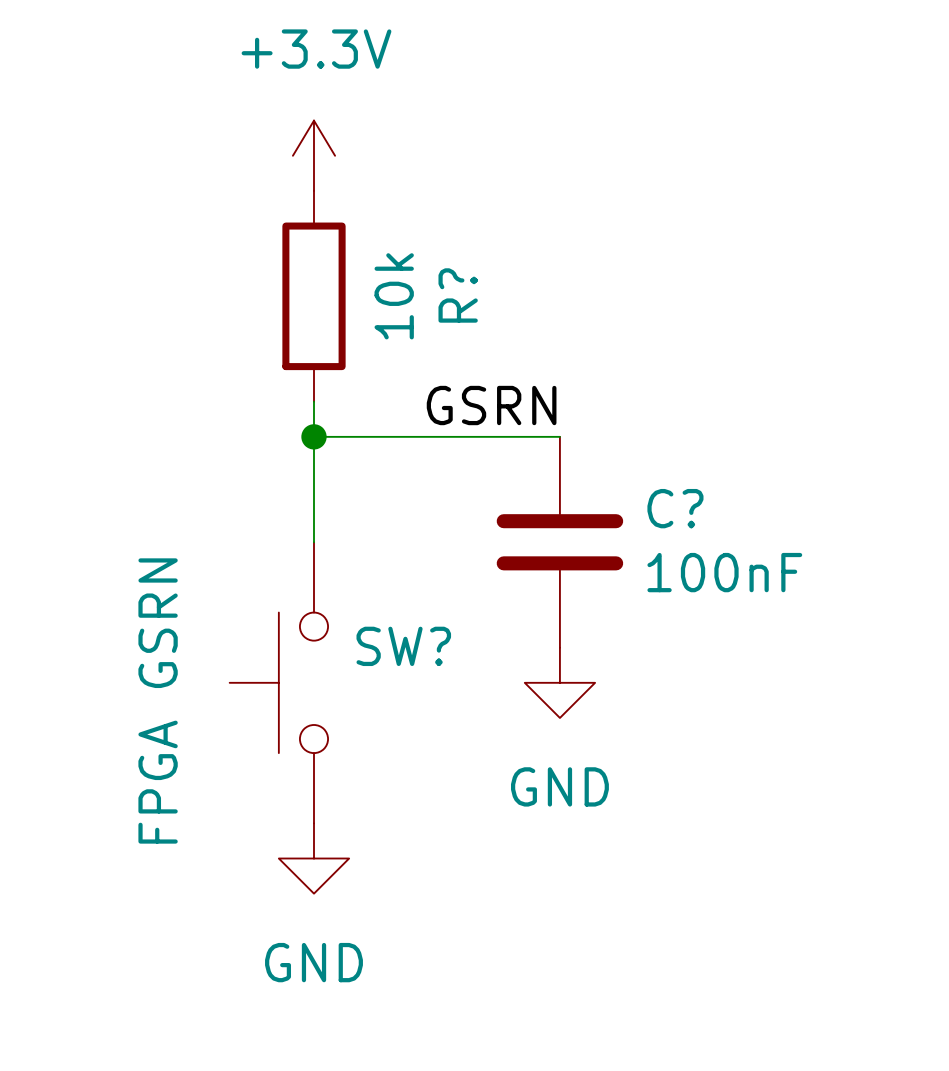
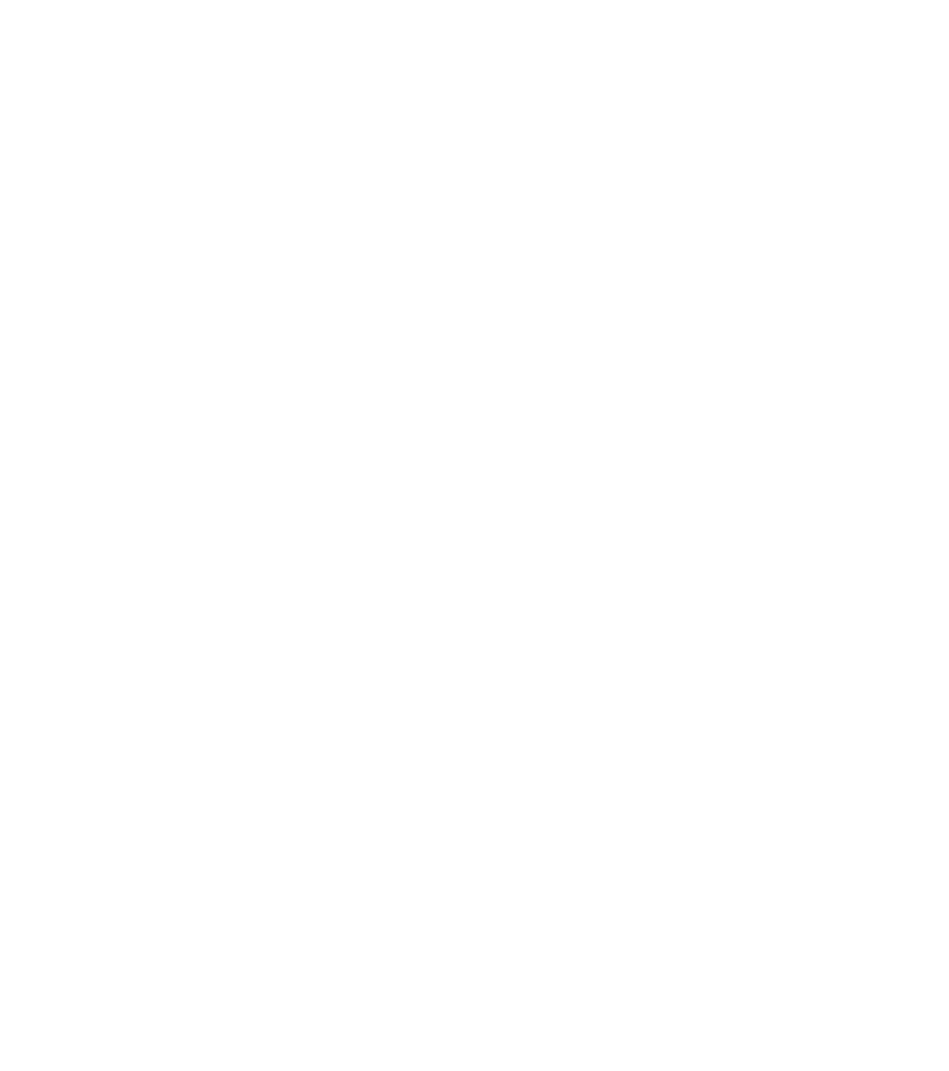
power symbol: +3.3V (313, 155) -> none
R?: 10k (313, 296) -> none
wire: (313, 401) (313, 542) -> none
label: GSRN (491, 405) -> none
wire: (313, 436) (559, 436) -> none
junction: (313, 436) -> none
C?: 100nF (559, 542) -> none
SW?: FPGA GSRN (278, 682) -> none
power symbol: GND (559, 682) -> none
power symbol: GND (313, 858) -> none

